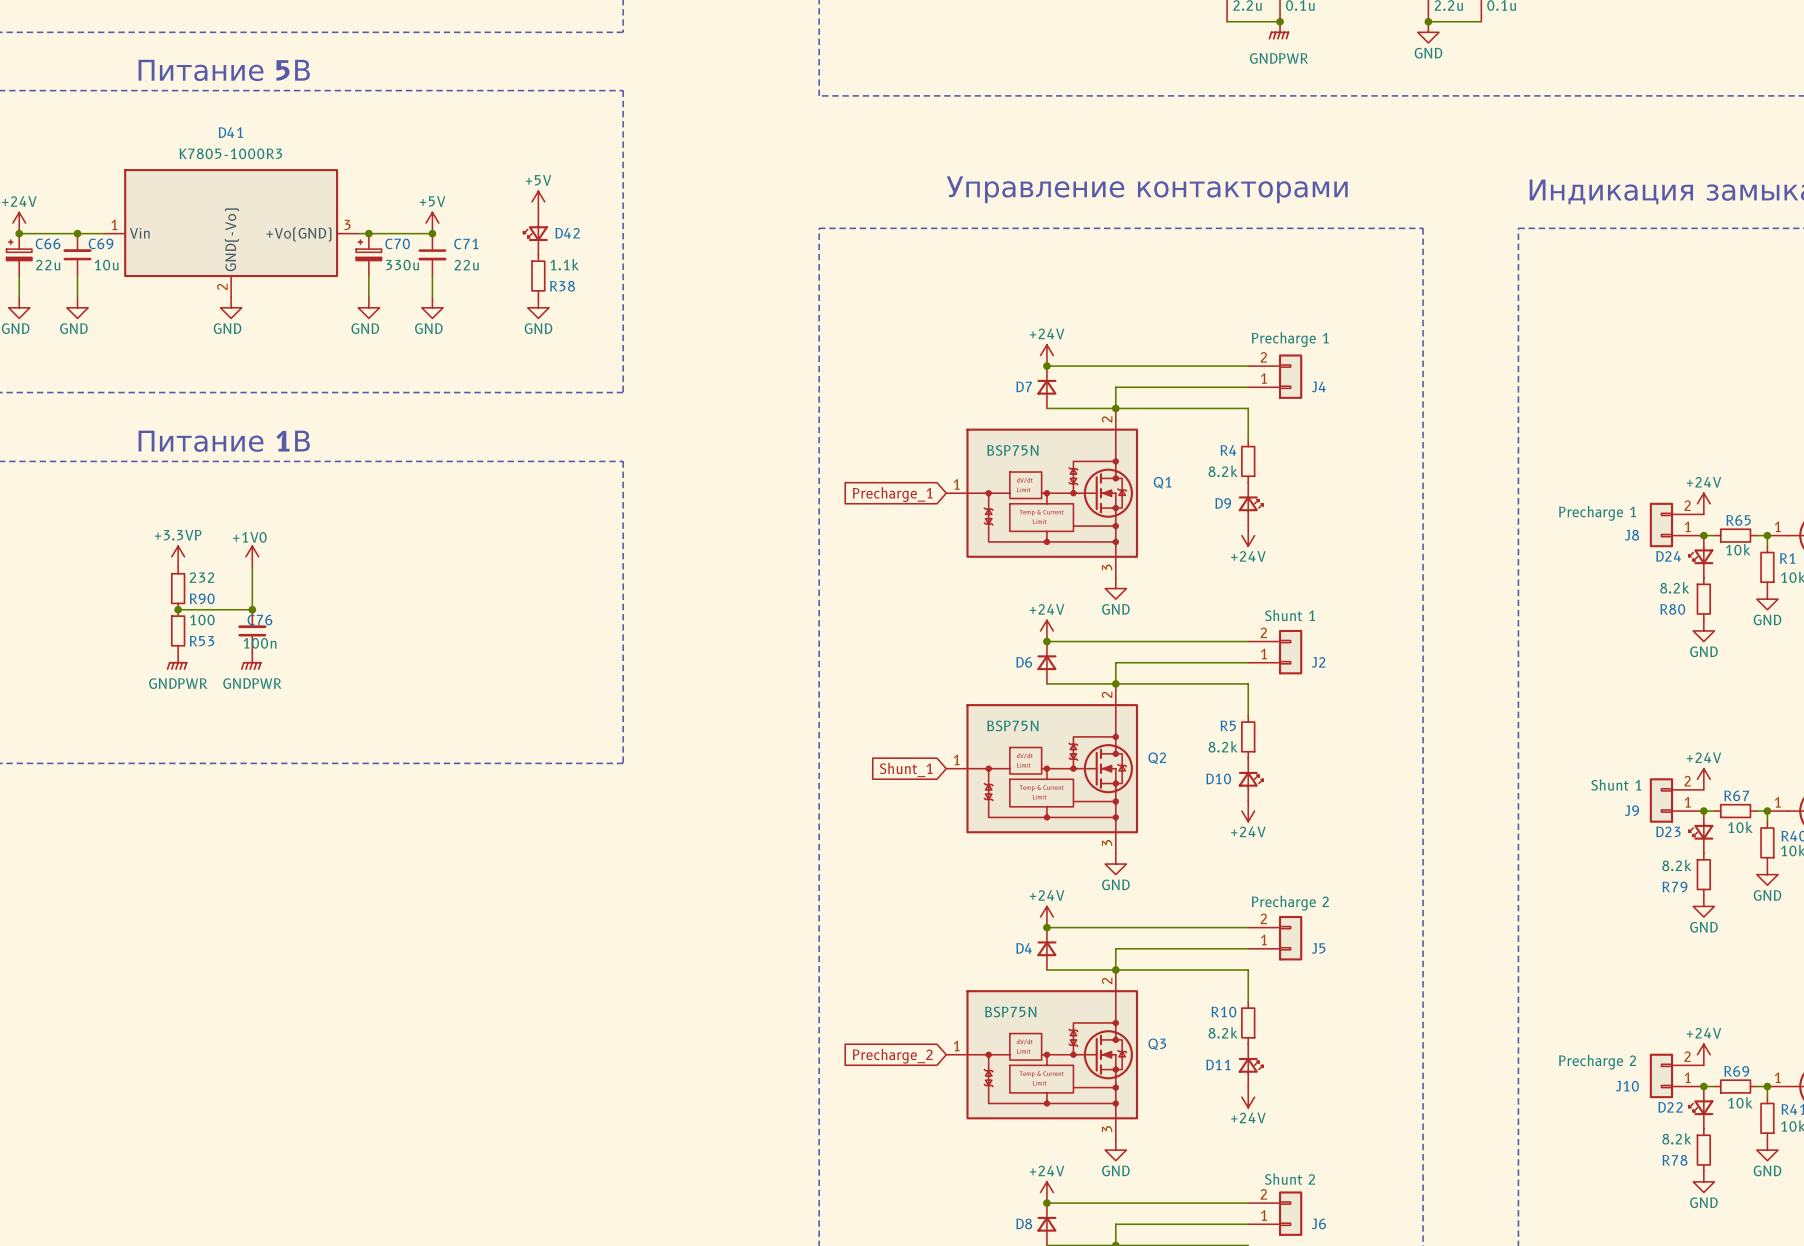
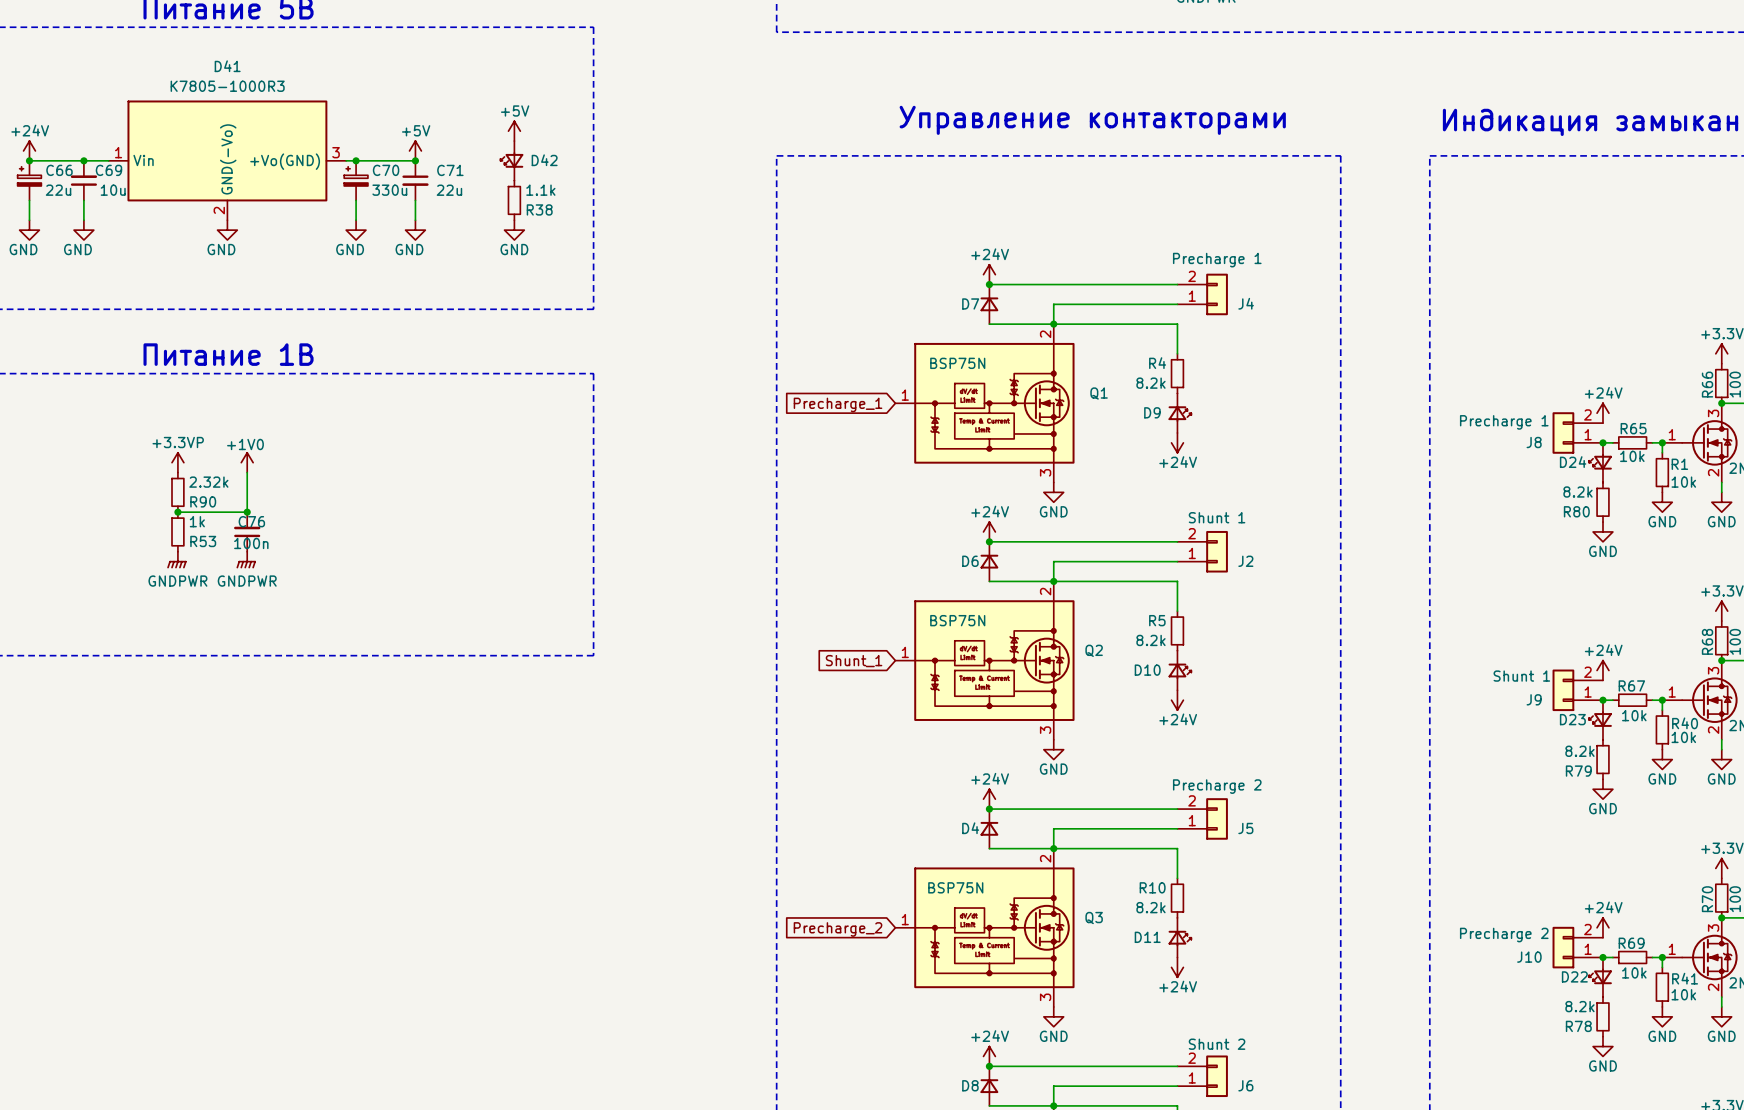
R90 value: 232 (202, 577) -> 2.32k (208, 482)
R53 value: 100 (202, 620) -> 1k (197, 521)

